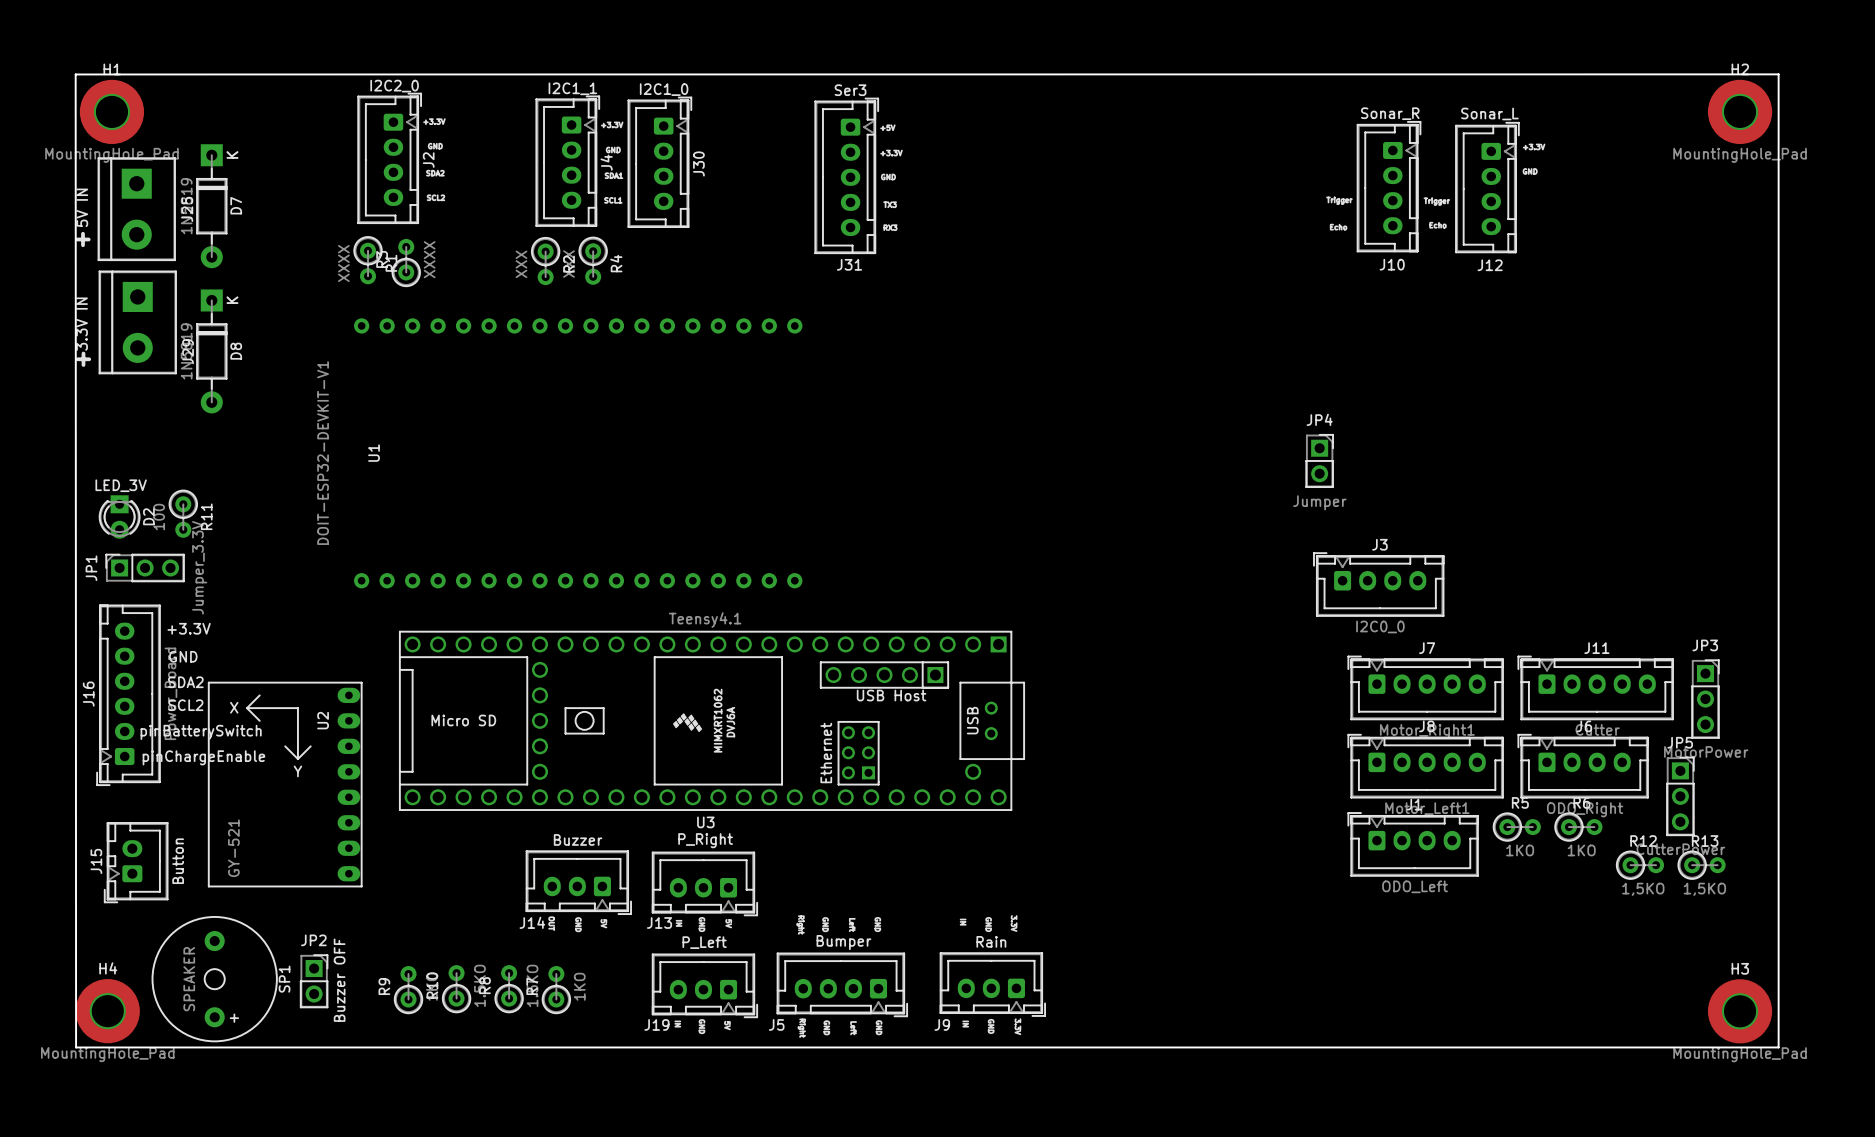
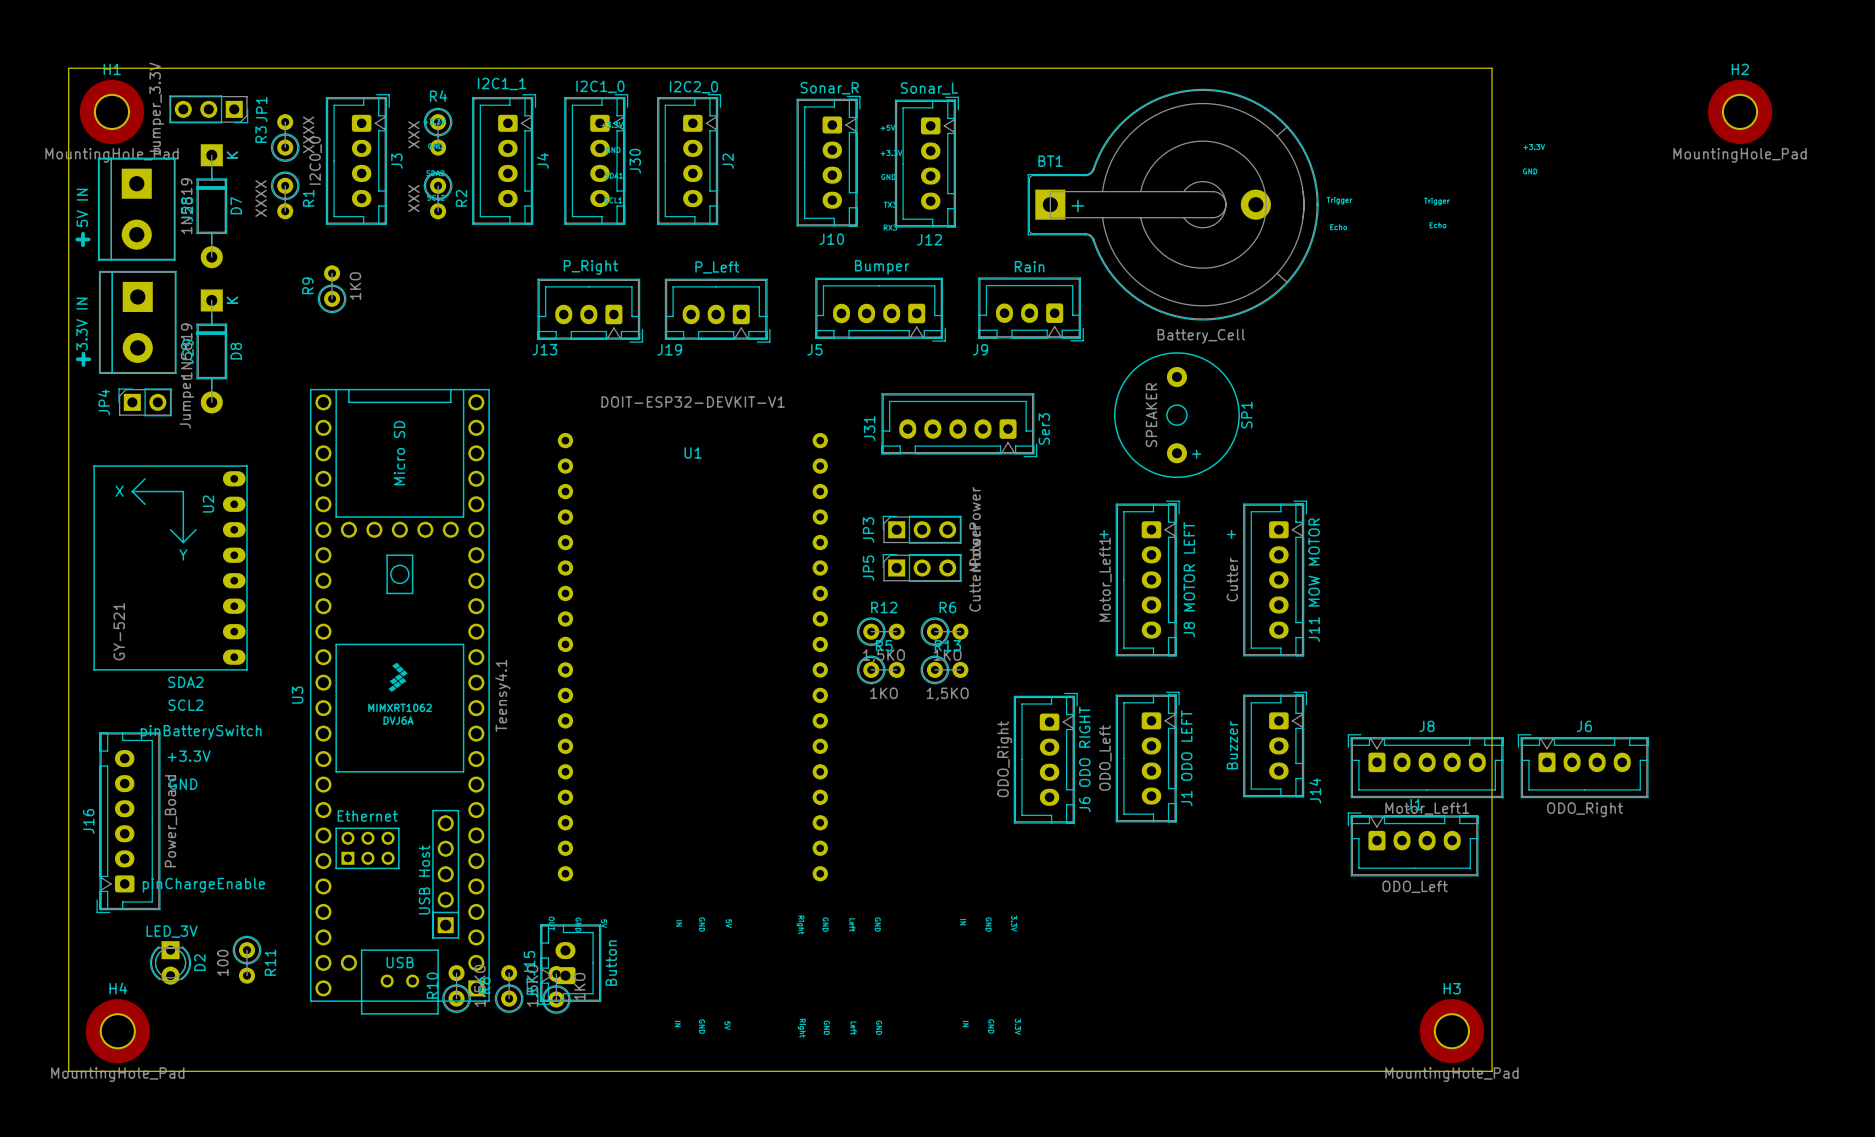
board edge: (1778, 74) (75, 74) (76, 1047) (1778, 1047) (1778, 74) -> (68, 68) (68, 1071) (1492, 1071) (1492, 68) (68, 68)
J4 value position: I2C1_1 (572, 88) -> I2C1_1 (502, 83)
J2 position: (389, 158) -> (689, 159)
J4 position: (567, 161) -> (504, 159)
J30 position: (659, 162) -> (596, 159)
J31 rotation: 0° (846, 175) -> 90° clockwise (959, 425)
J31 position: (846, 175) -> (959, 425)
J10 position: (1389, 186) -> (828, 161)
J12 position: (1487, 187) -> (926, 162)
BT1: none -> Battery_Cell (1173, 204)
R1 position: (368, 260) -> (285, 195)
R4 position: (593, 260) -> (438, 131)
R2 position: (545, 261) -> (438, 195)
R3 position: (406, 262) -> (285, 138)
R4 name rotation: 0° (616, 263) -> 90° clockwise (438, 96)
R4 name position: R4 (616, 263) -> R4 (438, 96)
U1 rotation: 0° (578, 453) -> 90° clockwise (692, 657)
JP4 rotation: 0° (1319, 460) -> 90° counterclockwise (145, 402)
JP4 position: (1319, 460) -> (145, 402)
R11 position: (183, 513) -> (247, 959)
D2 position: (119, 517) -> (170, 962)
text: none -> + (1104, 534)
text: none -> + (1231, 534)
JP1 rotation: 0° (145, 567) -> 180° (208, 109)
JP1 position: (145, 567) -> (208, 109)
J8 MOTOR LEFT: none -> Motor_Left1 (1147, 578)
J11 MOW MOTOR: none -> Cutter (1275, 578)
J3 rotation: 0° (1378, 584) -> 90° clockwise (357, 159)
J3 position: (1378, 584) -> (357, 159)
text position: +3.3V (189, 628) -> +3.3V (189, 756)
text position: GND (183, 656) -> GND (183, 784)
J7: Motor_Right1 (1425, 687) -> none
J11: Cutter (1595, 687) -> none
J16 position: (128, 695) -> (128, 822)
JP3 rotation: 0° (1705, 699) -> 90° counterclockwise (922, 529)
JP3 position: (1705, 699) -> (922, 529)
U3 rotation: 0° (711, 720) -> 90° clockwise (399, 701)
text position: pinChargeEnable (203, 757) -> pinChargeEnable (203, 885)
J1 ODO LEFT: none -> ODO_Left (1147, 757)
J6 ODO RIGHT: none -> ODO_Right (1045, 758)
U2 position: (285, 784) -> (170, 567)
JP5 rotation: 0° (1680, 796) -> 90° counterclockwise (922, 567)
JP5 position: (1680, 796) -> (922, 567)
R5 position: (1516, 827) -> (880, 669)
R6 position: (1578, 827) -> (944, 631)
J15 position: (136, 862) -> (569, 964)
R12 position: (1640, 865) -> (880, 631)
R13 position: (1701, 865) -> (944, 669)
J14 rotation: 0° (578, 882) -> 90° counterclockwise (1275, 744)
J14 position: (578, 882) -> (1275, 744)
J13 position: (704, 883) -> (590, 310)
SP1 position: (214, 979) -> (1176, 415)
JP2: Buzzer OFF (314, 981) -> none
J5 position: (842, 984) -> (880, 309)
J9 position: (992, 984) -> (1031, 309)
J19 position: (704, 985) -> (717, 310)
R9 position: (408, 989) -> (332, 289)
H4 position: (107, 1011) -> (117, 1031)
H3 position: (1740, 1011) -> (1451, 1031)

